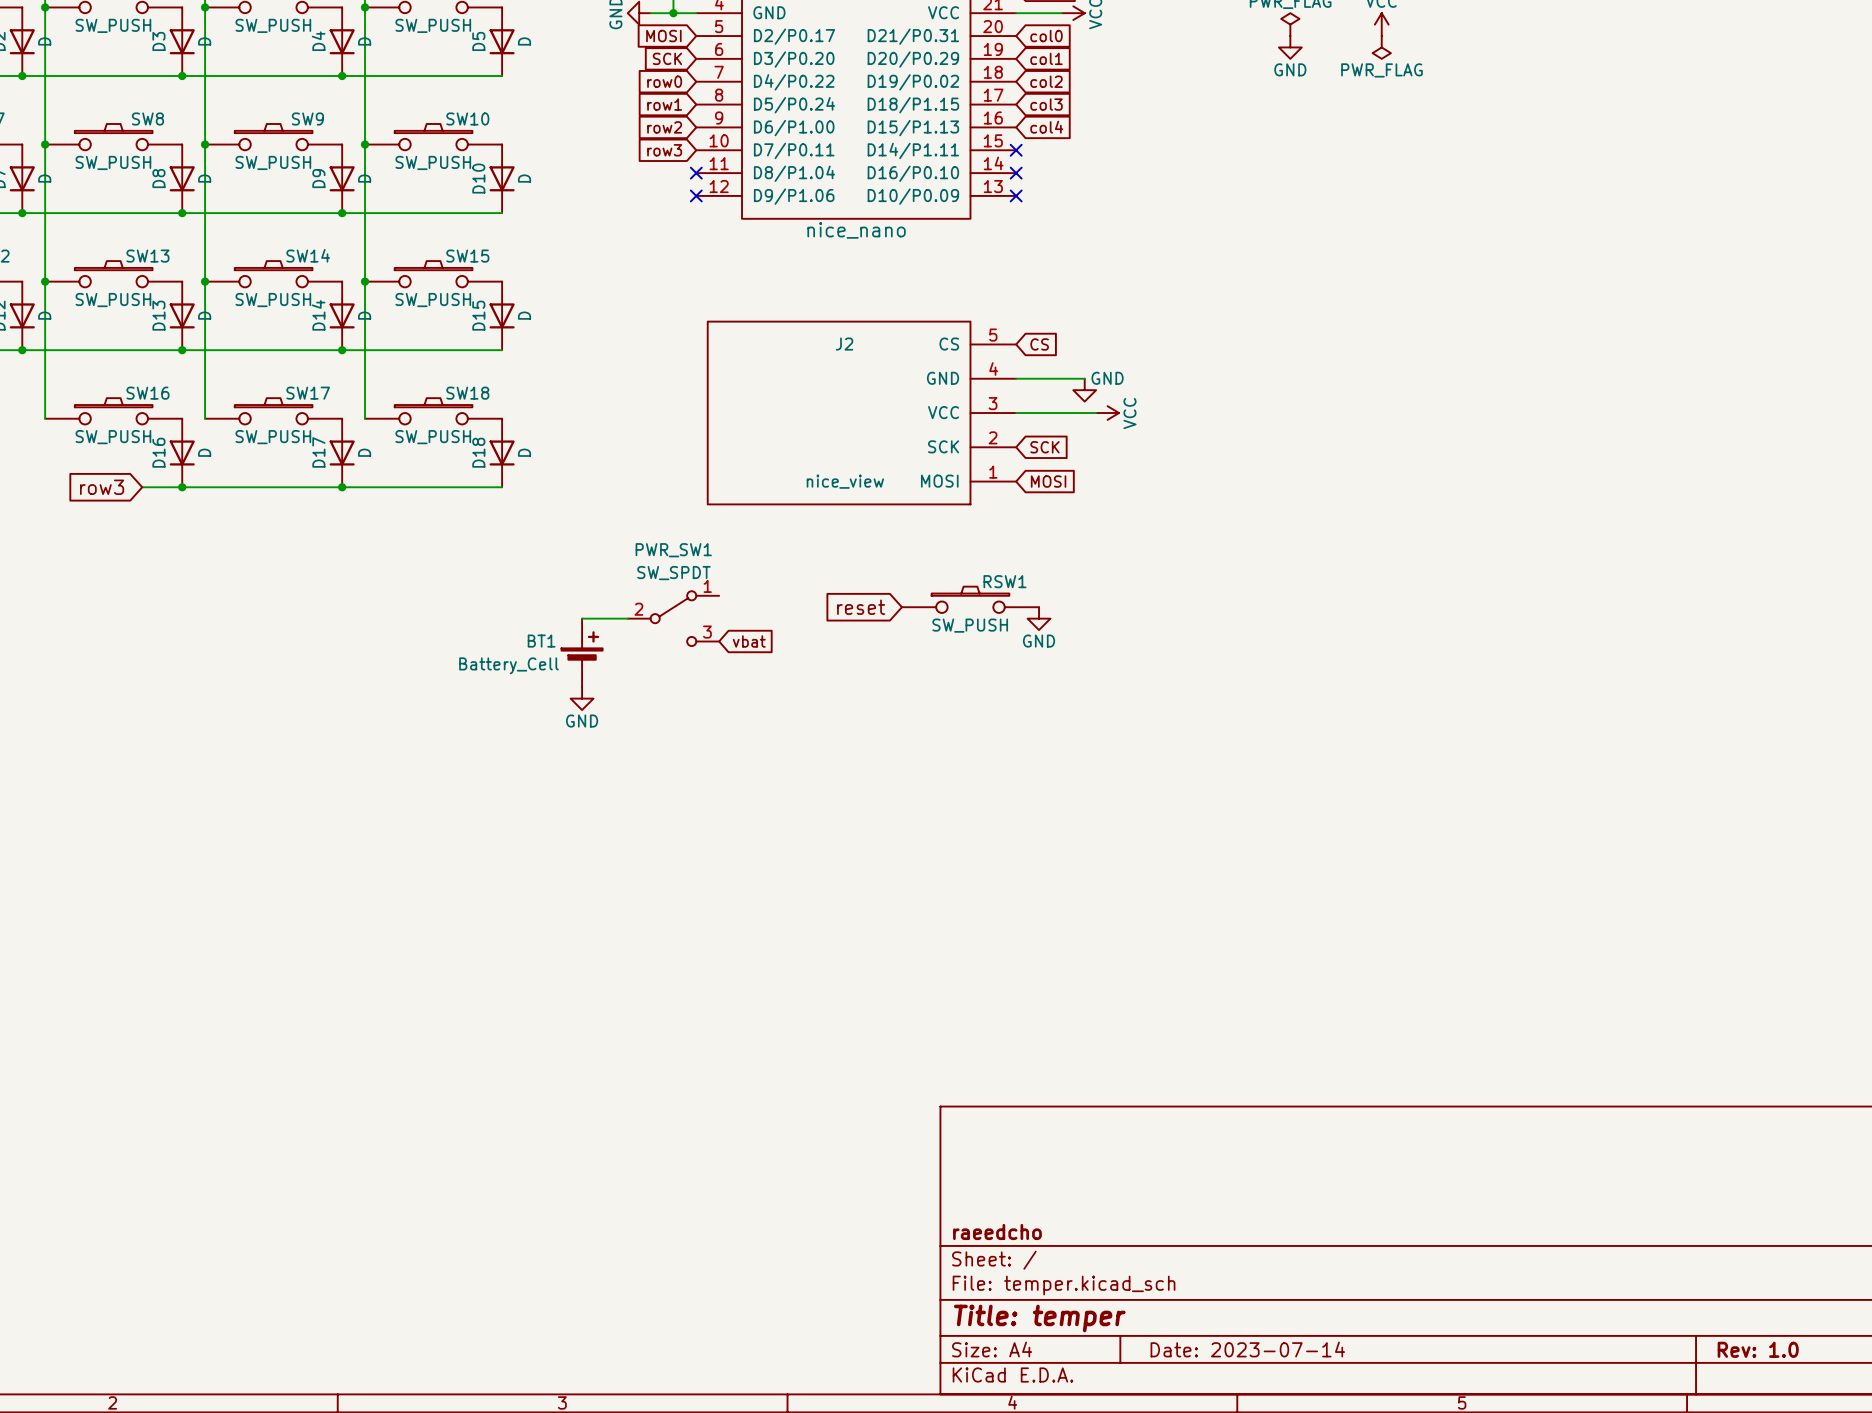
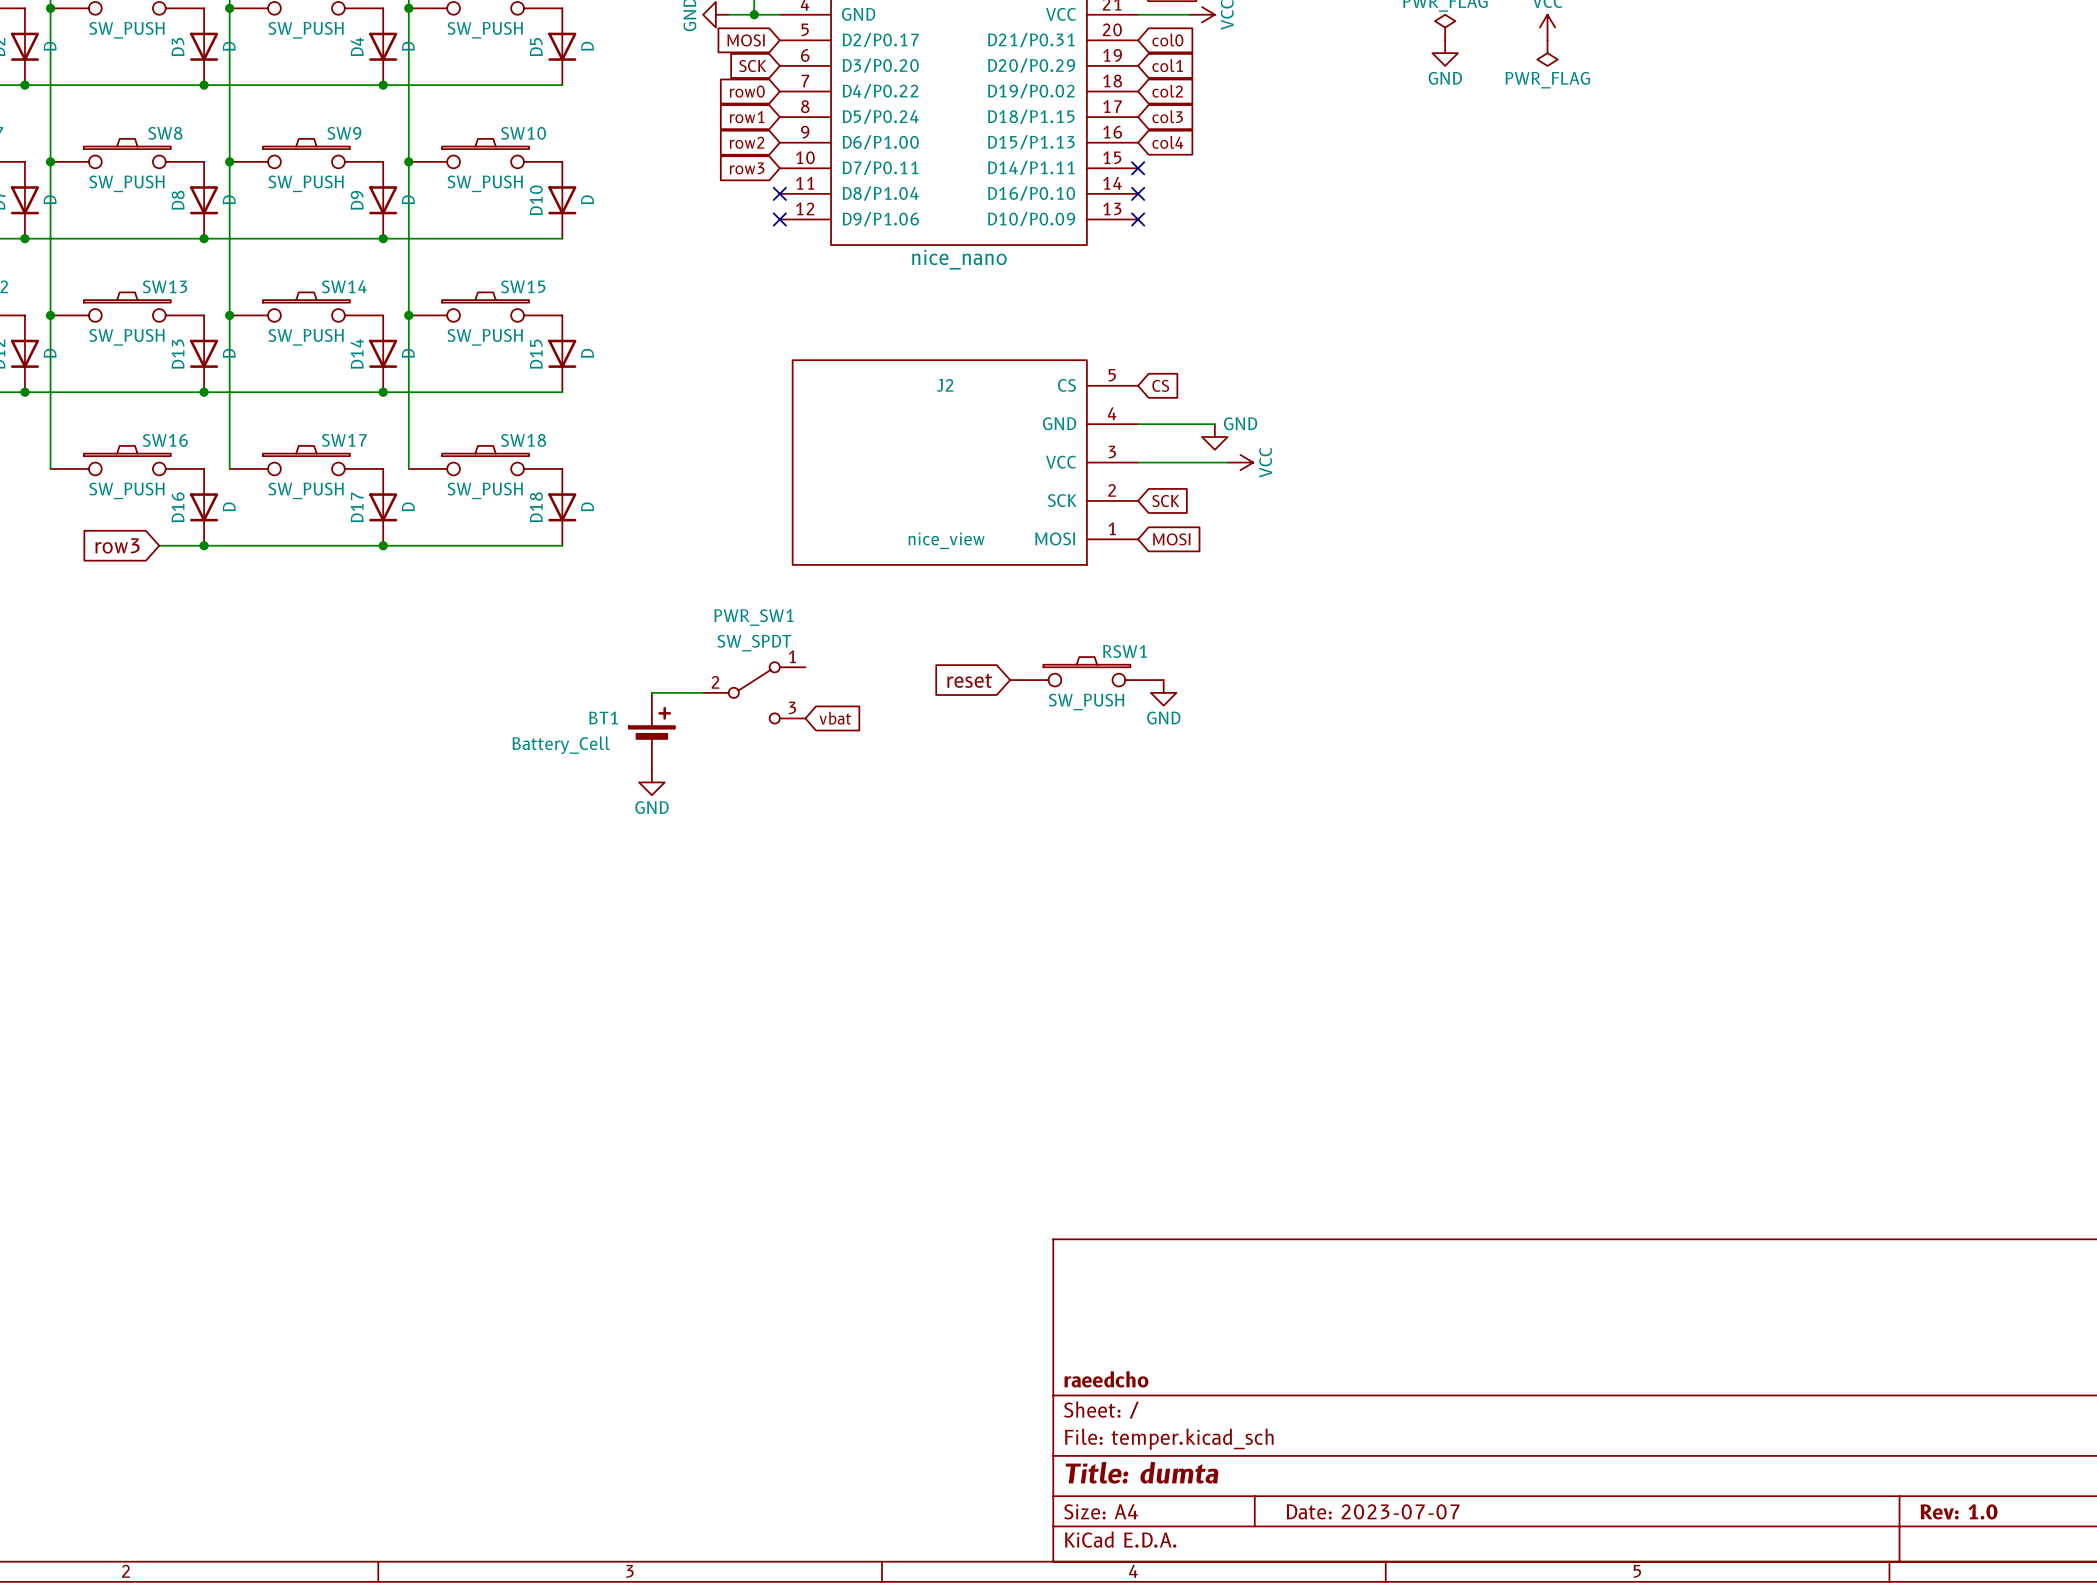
title block: Title: temper (1039, 1318) -> Title: dumta (1142, 1472)
title block: Date: 2023-07-14 (1247, 1349) -> Date: 2023-07-07 (1373, 1511)

